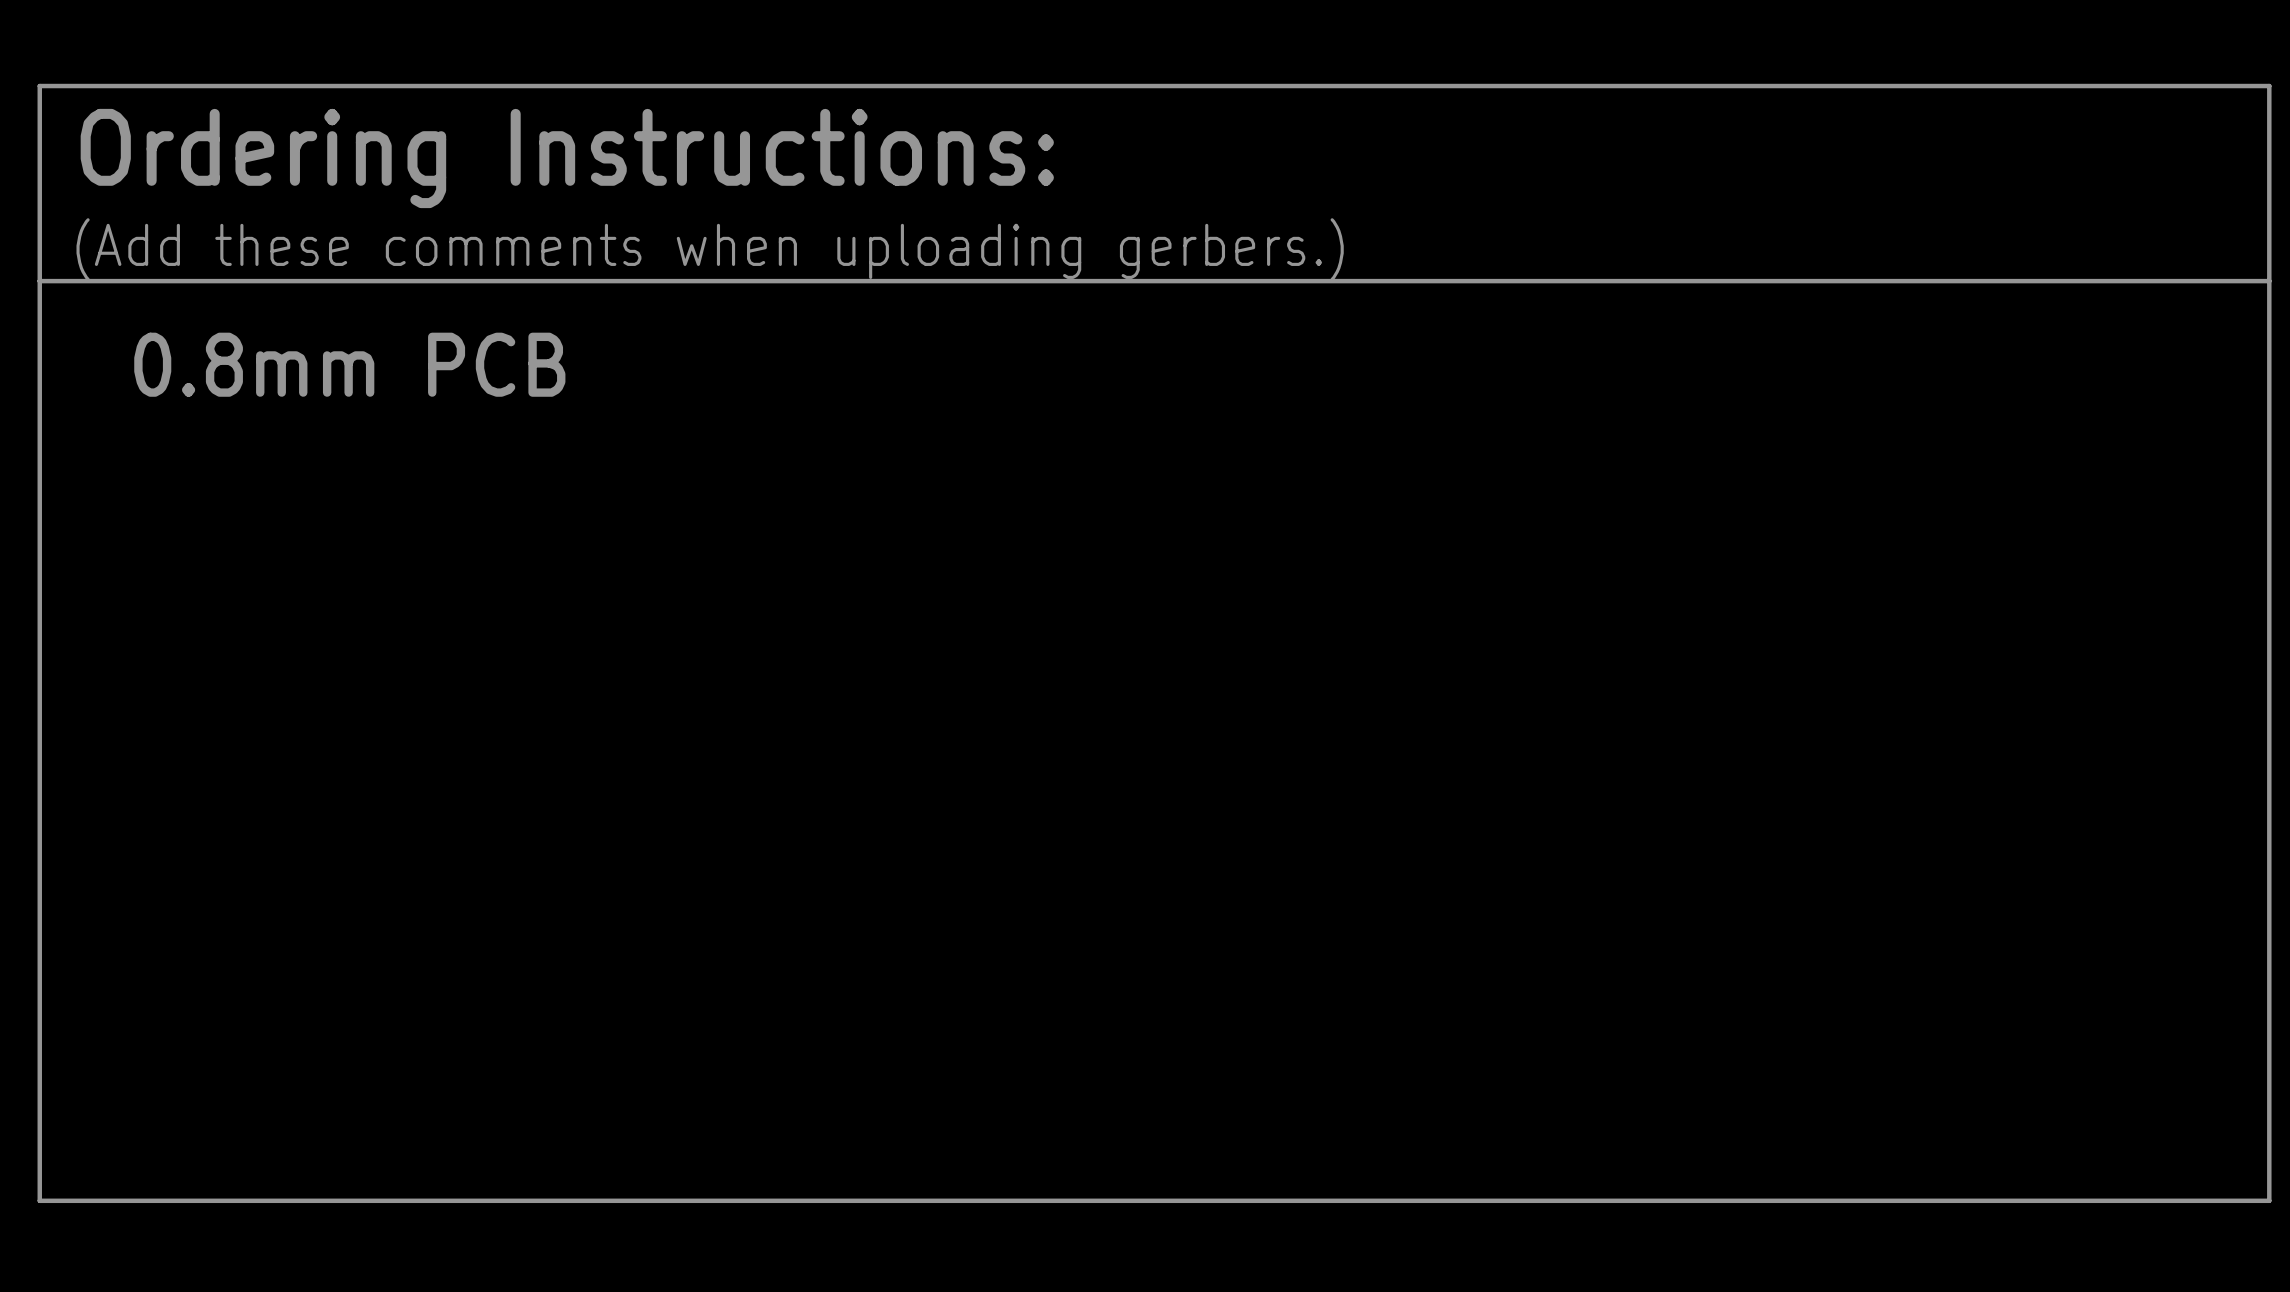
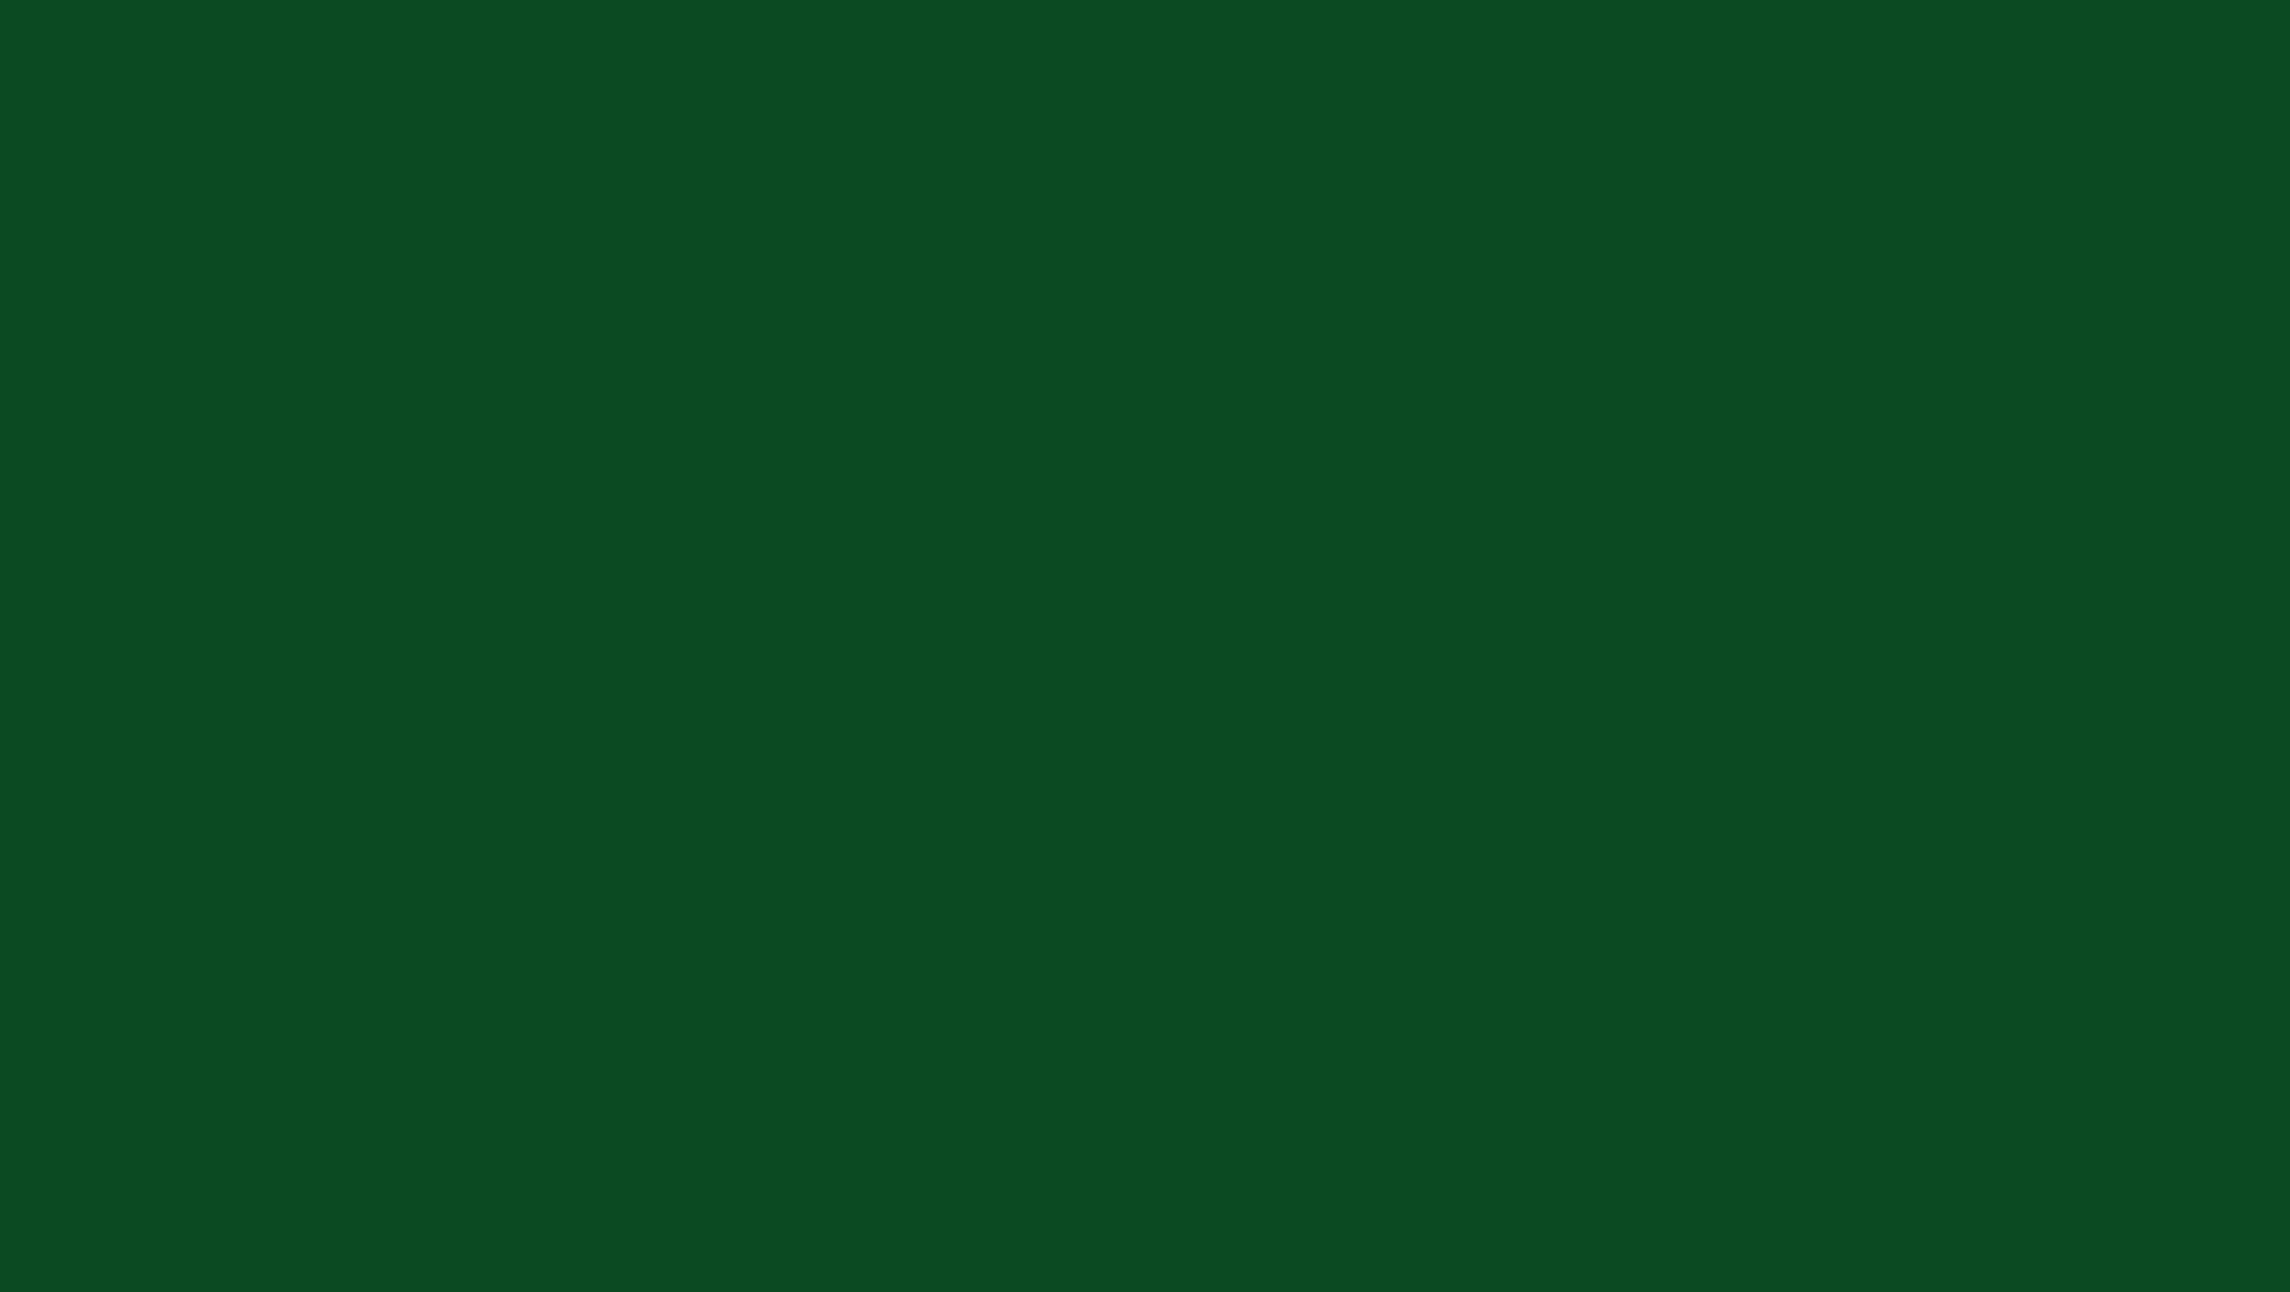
drawing: [37, 83, 2272, 1204] -> none
text: 0.8mm PCB (349, 364) -> none

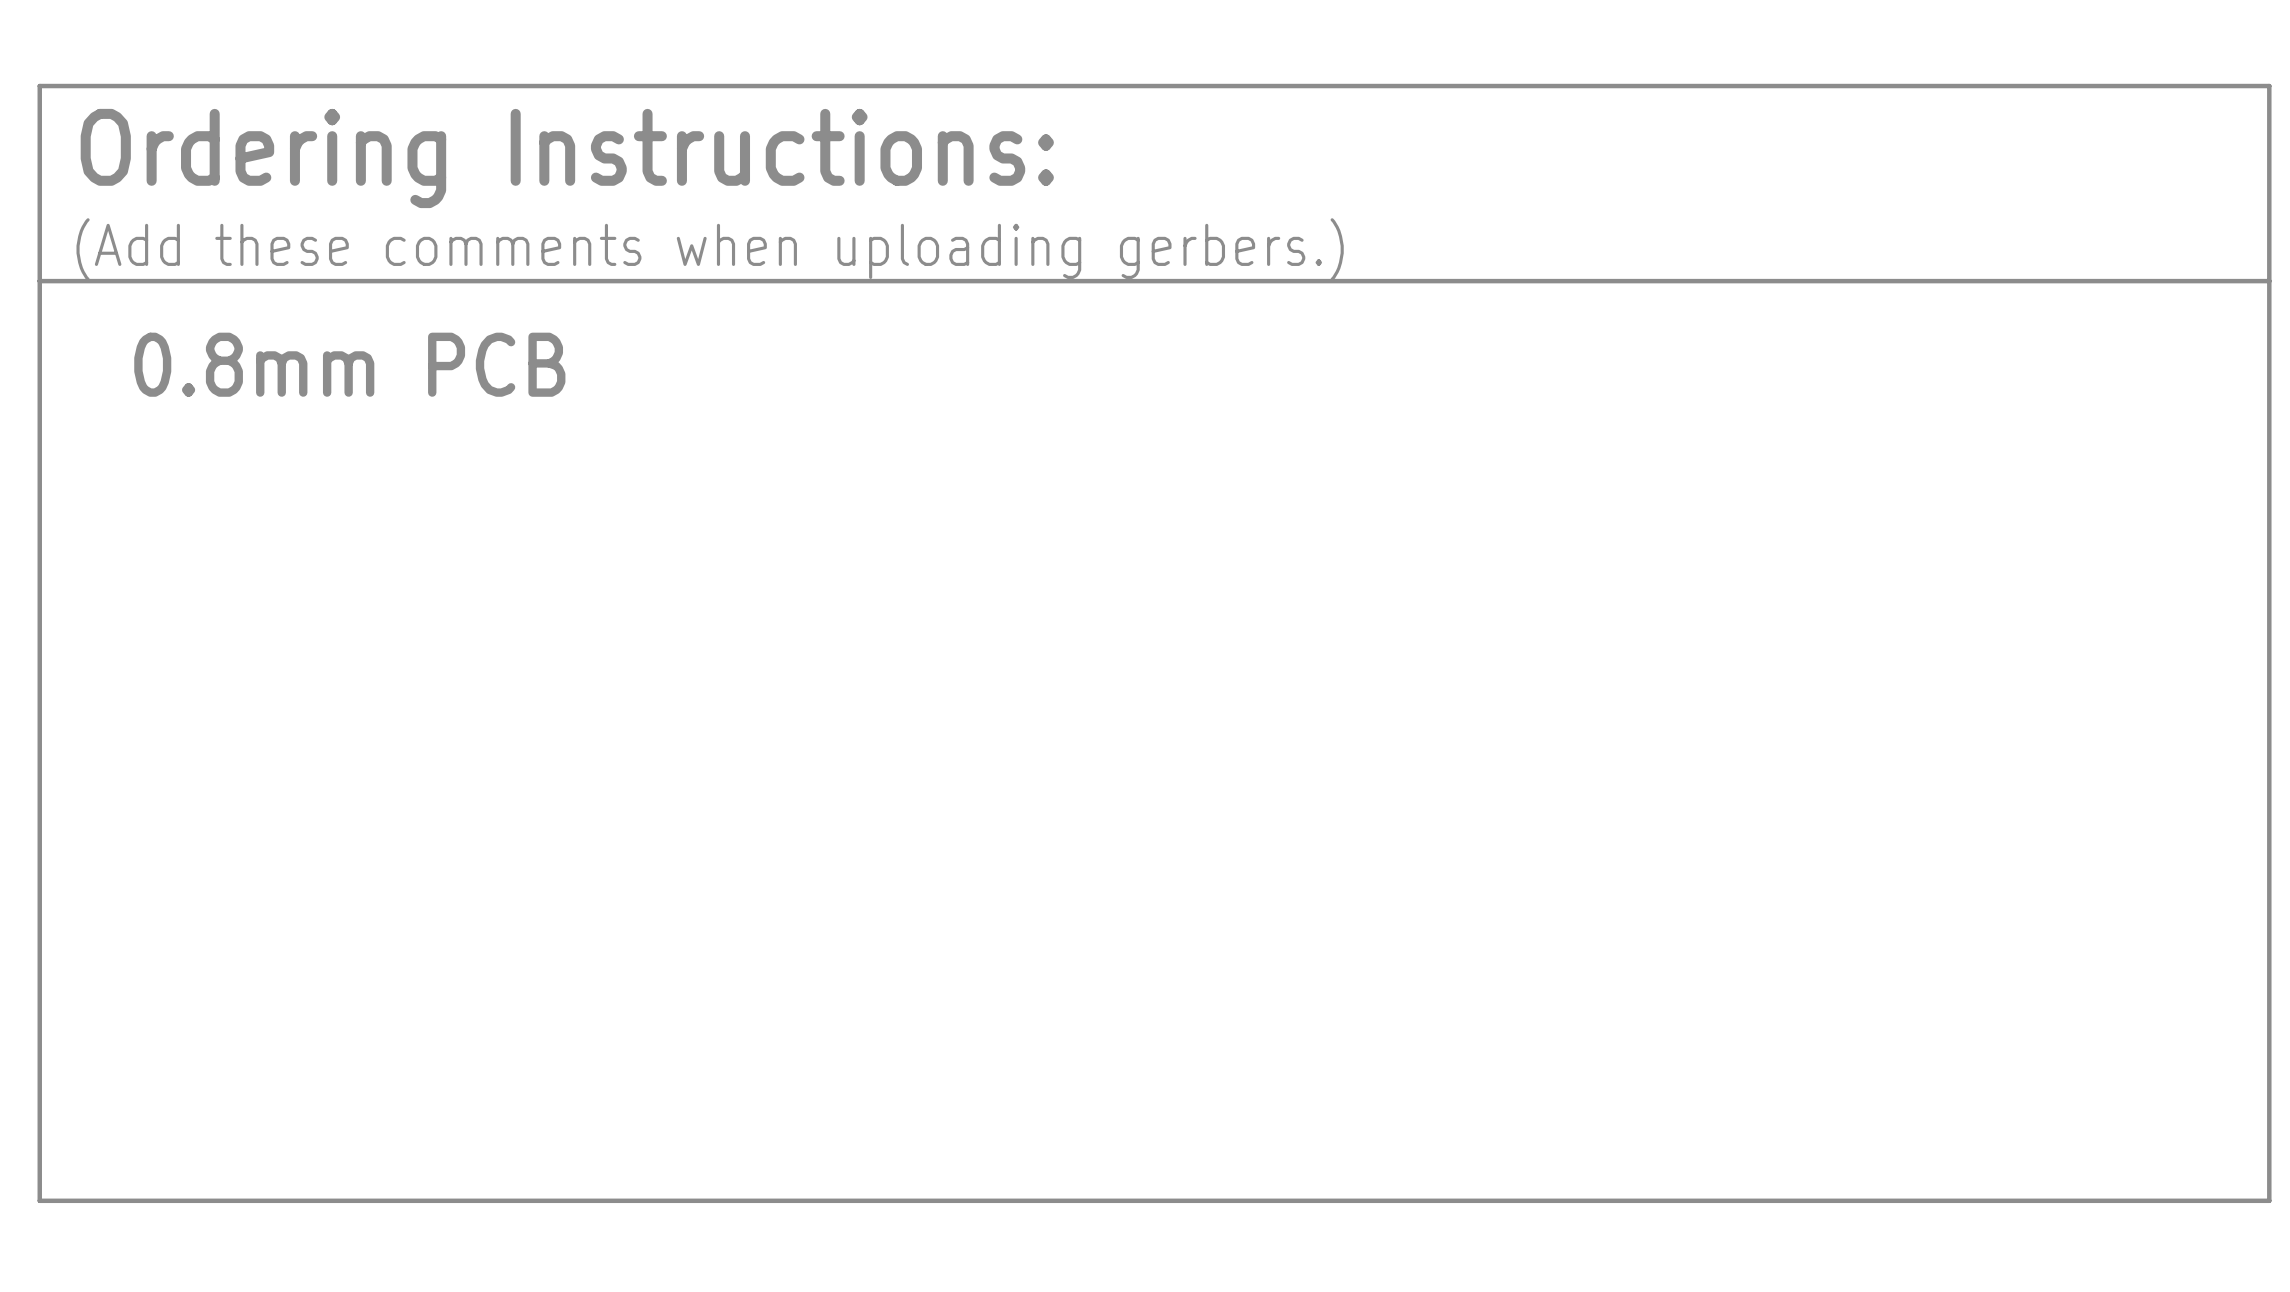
drawing: none -> [37, 83, 2272, 1204]
text: none -> 0.8mm PCB (349, 364)

